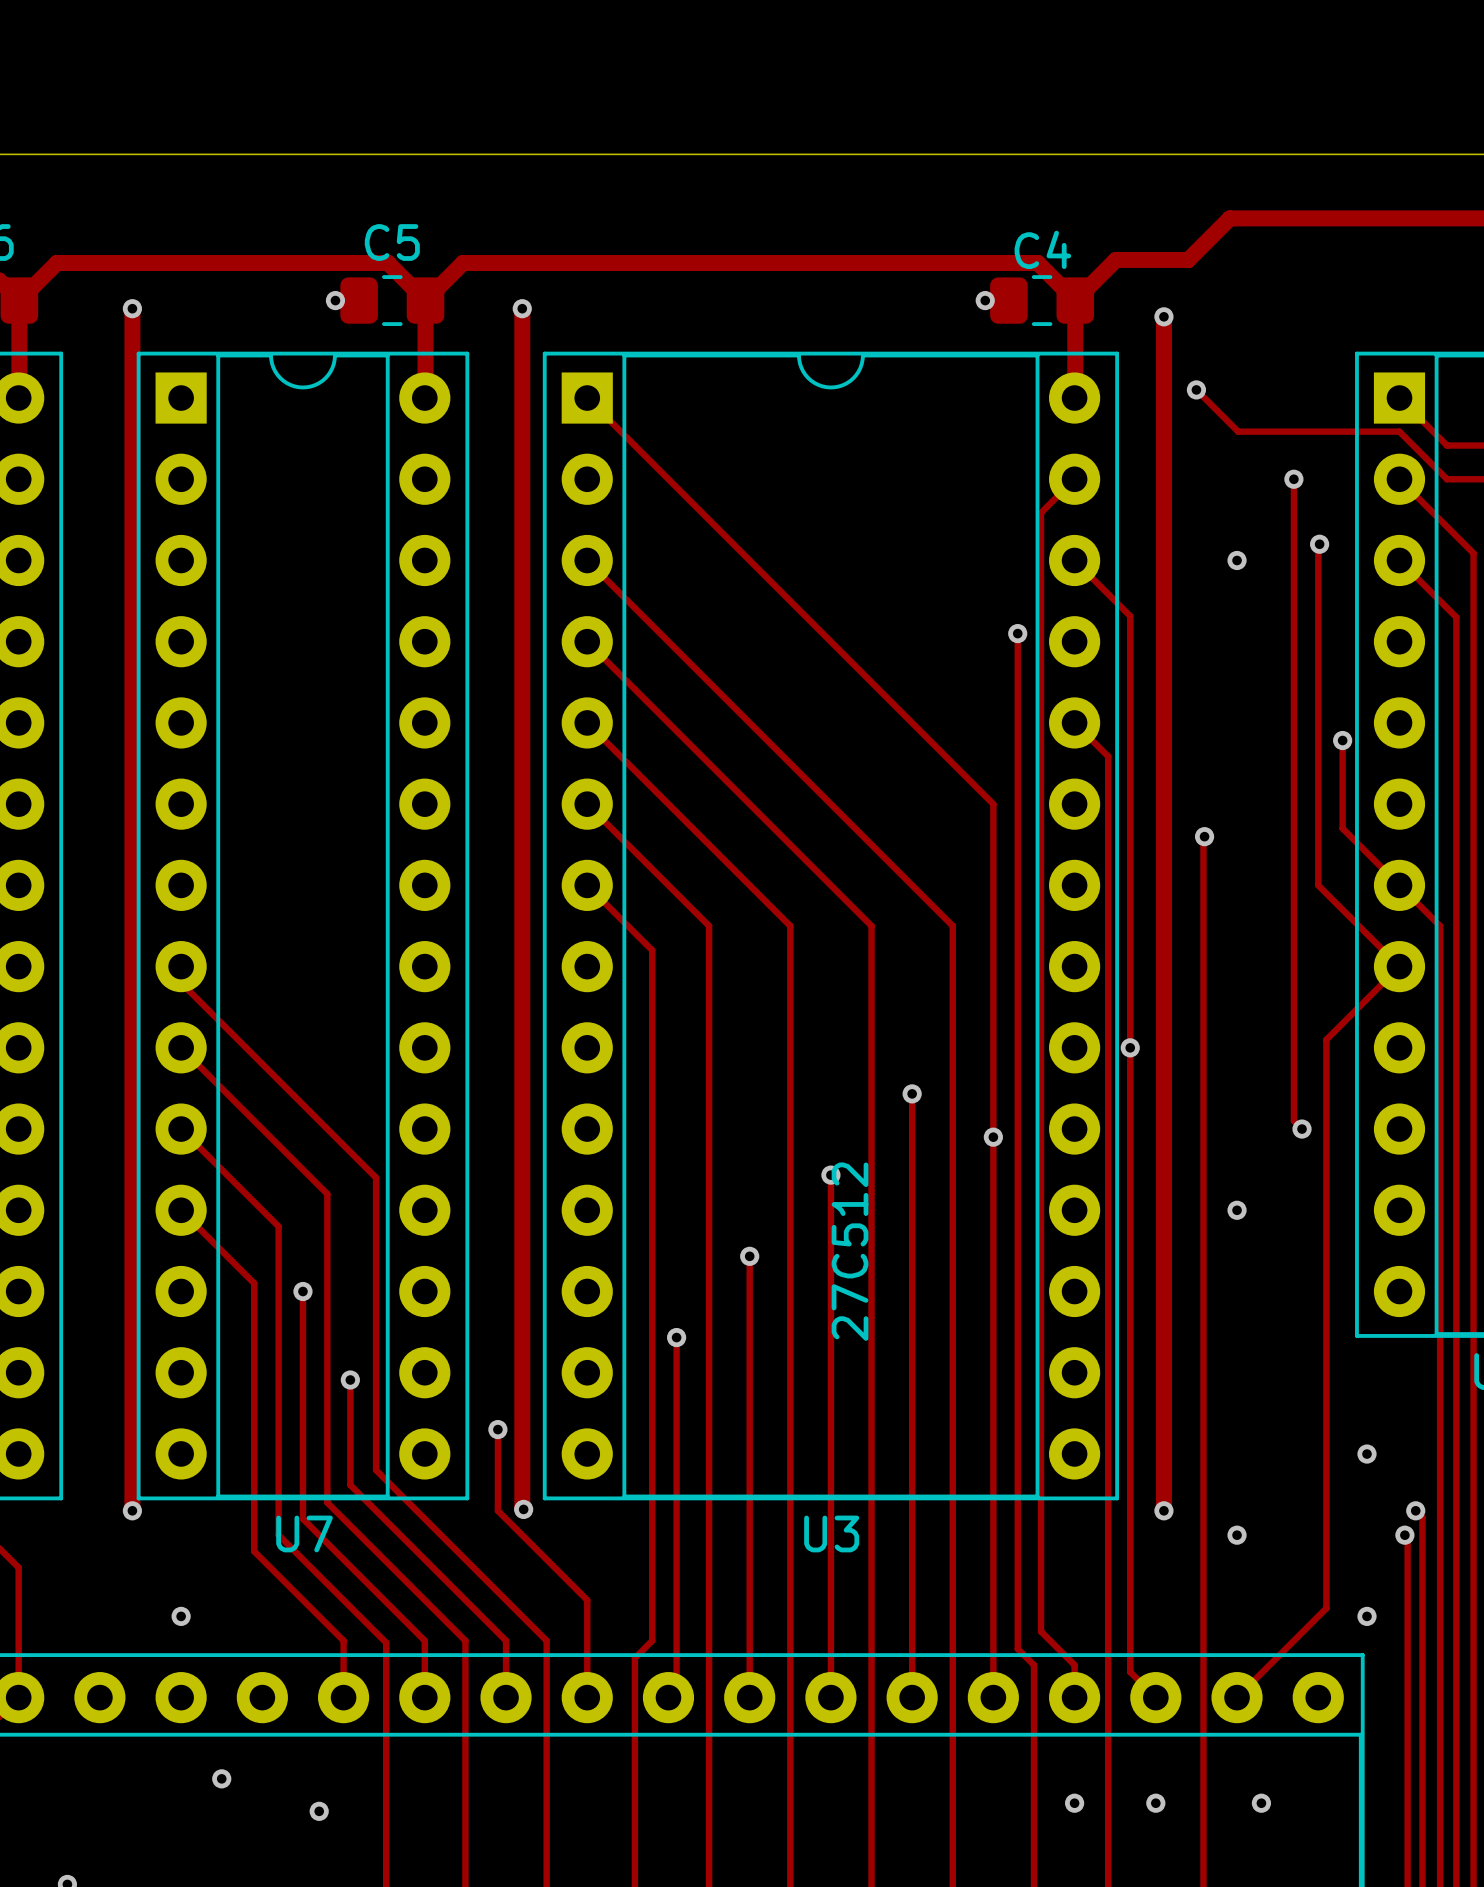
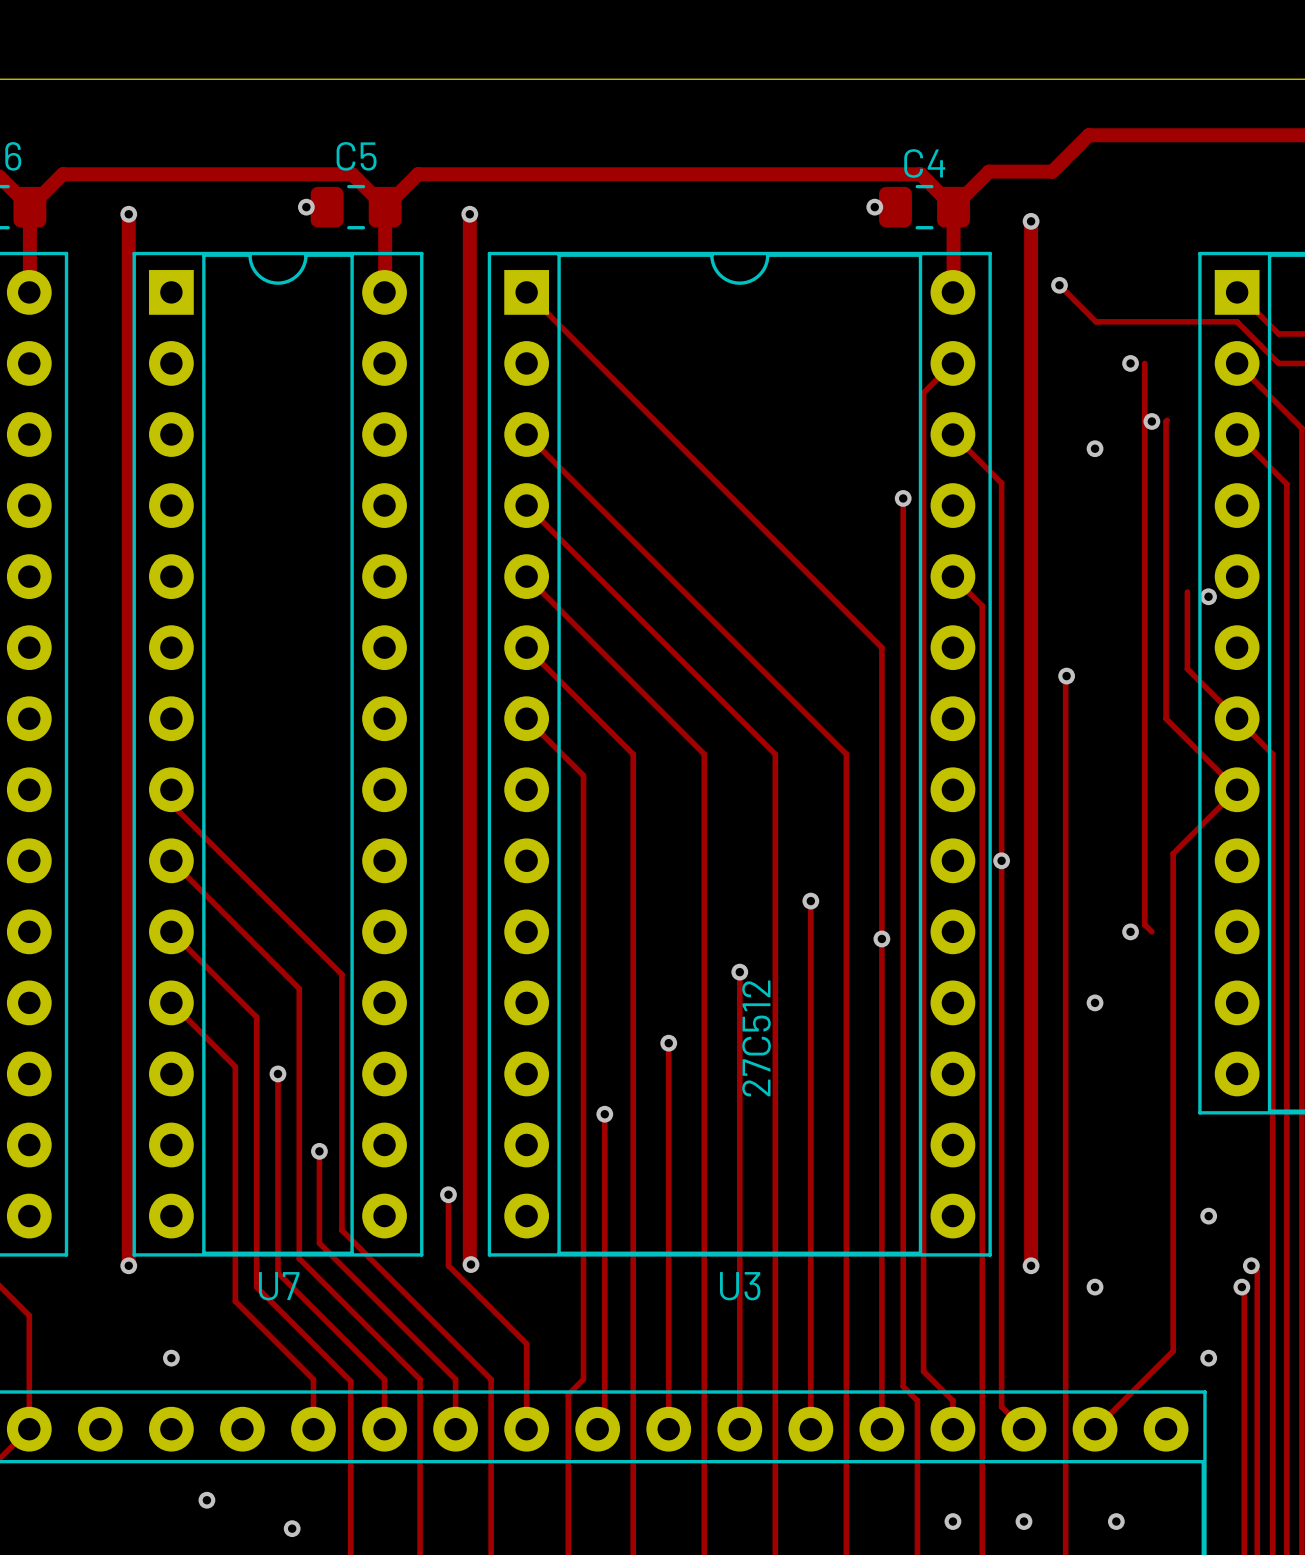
via position: (1293, 479) -> (1130, 363)
via position: (1319, 544) -> (1151, 421)
via position: (1237, 560) -> (1095, 448)
via position: (1342, 740) -> (1208, 596)
via position: (1302, 1129) -> (1130, 931)

